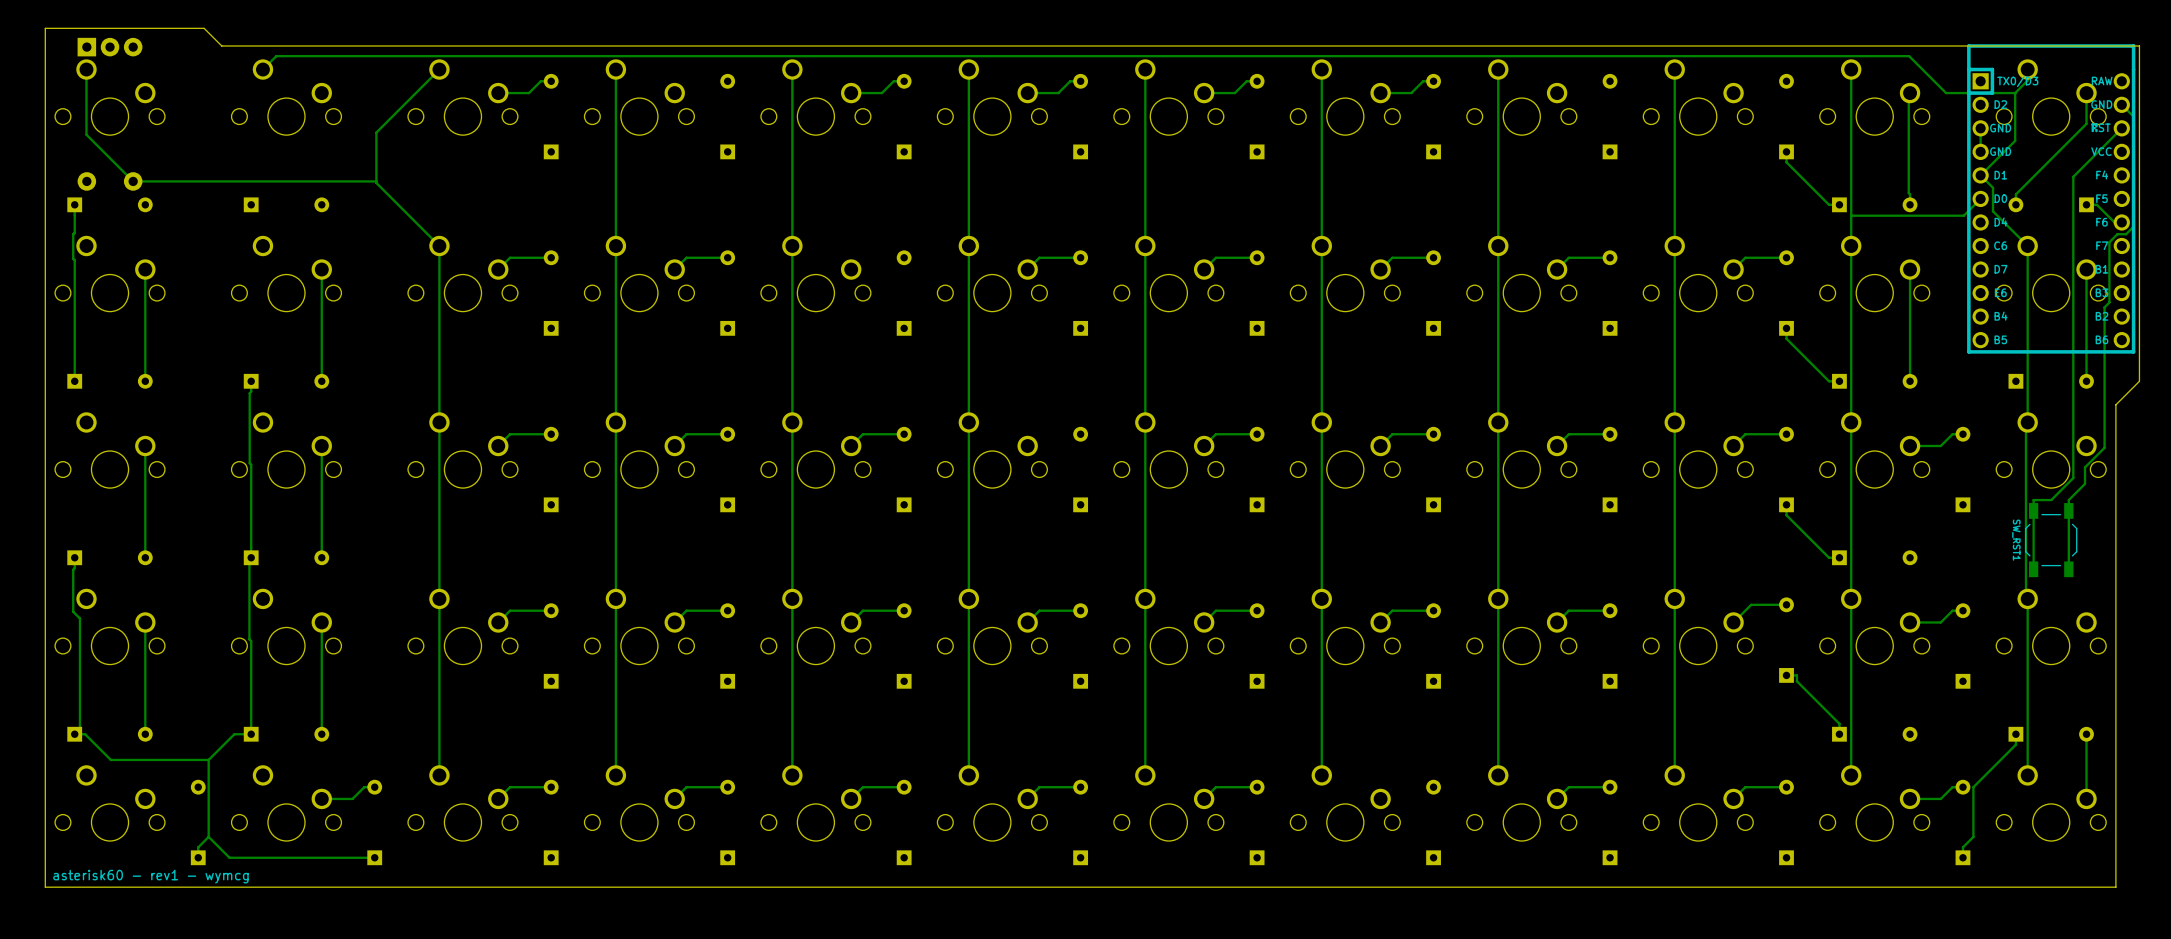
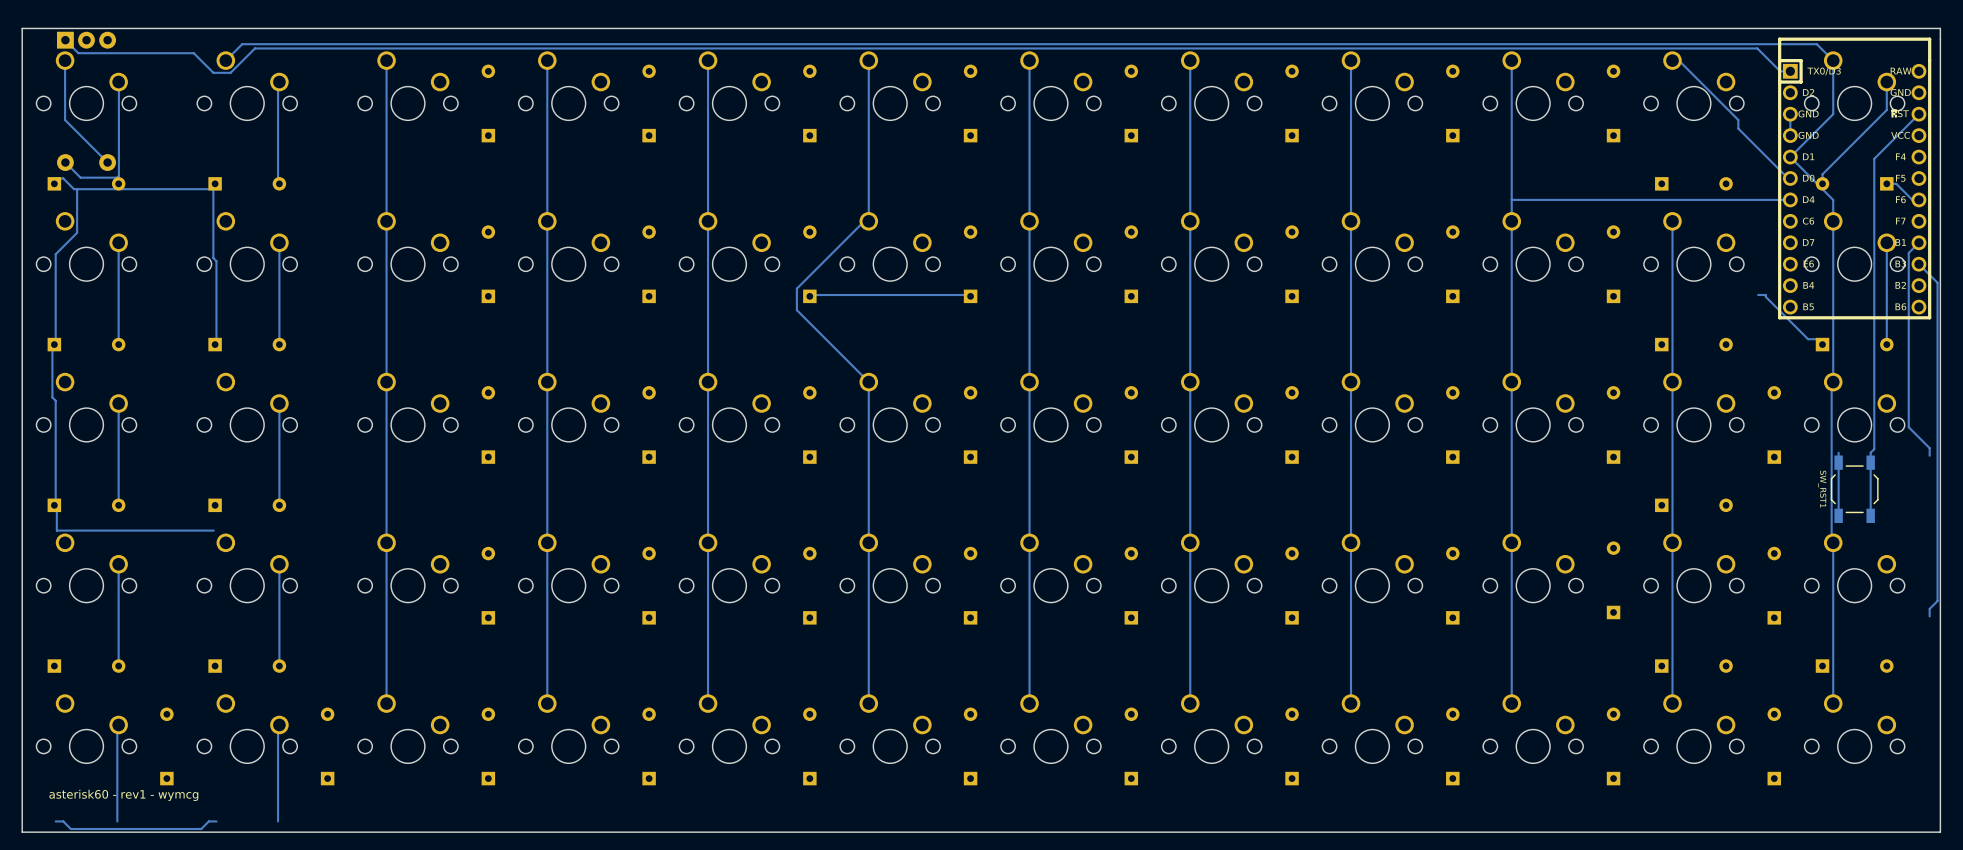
board edge: (204, 28) (45, 28) (45, 887) (2115, 887) (2115, 404) (2139, 381) (2139, 46) (221, 46) (204, 28) -> (1940, 28) (1940, 832) (22, 832) (22, 28) (1940, 28)
track: none -> (65, 40) (78, 53) (193, 53) (213, 72) (230, 72) (254, 48) (1757, 48) (1780, 71) (1790, 71)
track: (276, 56) (1909, 56) (1946, 93) (2015, 93) -> (238, 48) (242, 44) (1816, 44) (1833, 60)
track: (439, 69) (376, 132) (376, 182) (439, 246) -> (386, 60) (386, 221)
track: (1851, 69) (1851, 246) -> (1672, 60) (1678, 60) (1738, 119) (1738, 128) (1790, 178)
track: (2027, 80) (2015, 93) -> none
track: (551, 81) (540, 81) (529, 93) (498, 93) -> none
track: (904, 81) (893, 81) (881, 93) (851, 93) -> none
track: (1080, 81) (1070, 81) (1058, 93) (1027, 93) -> none
track: (1257, 81) (1246, 81) (1234, 93) (1204, 93) -> none
track: (1433, 81) (1423, 81) (1411, 93) (1380, 93) -> none
track: none -> (118, 82) (118, 176) (117, 177)
track: none -> (279, 82) (278, 178)
track: (1910, 93) (1910, 204) -> none
track: (2015, 93) (2015, 140) -> (1833, 70) (1833, 114) (1821, 125)
track: (2121, 104) (2133, 116) (2133, 227) (2126, 234) (2117, 234) (2109, 242) (2109, 302) (2104, 307) (2104, 447) (2085, 467) (2085, 483) (2072, 496) -> none
track: (1786, 151) (1786, 162) (1829, 204) (1839, 204) -> none
track: (2073, 176) (2073, 478) (2051, 500) (2033, 500) -> (1874, 158) (1874, 449)
track: none -> (65, 162) (80, 177) (117, 177)
track: (376, 181) (133, 181) -> none
track: (1993, 187) (1993, 211) (2027, 246) -> (1801, 168) (1833, 199) (1833, 221)
track: none -> (55, 178) (63, 178) (74, 189) (213, 189)
track: (1980, 198) (1963, 215) (1851, 215) -> none
track: (74, 204) (74, 381) -> none
track: none -> (77, 189) (77, 232) (55, 254) (55, 346) (52, 350) (52, 397) (55, 400) (56, 530) (213, 530)
track: none -> (213, 189) (213, 258) (216, 261) (216, 339)
track: none -> (1790, 199) (1511, 199)
track: (968, 246) (968, 422) -> (868, 221) (864, 221) (796, 288) (796, 310) (868, 382)
track: (551, 257) (510, 257) (498, 269) -> none
track: (727, 257) (686, 257) (674, 269) -> none
track: (1080, 257) (1039, 257) (1027, 269) -> none
track: (1257, 257) (1215, 257) (1204, 269) -> none
track: (1433, 257) (1392, 257) (1380, 269) -> none
track: (1610, 257) (1568, 257) (1557, 269) -> none
track: (1786, 257) (1745, 257) (1733, 269) -> none
track: (1910, 269) (1910, 381) -> none
track: none -> (1918, 242) (1908, 252) (1908, 427) (1929, 448) (1929, 455)
track: none -> (1918, 264) (1937, 282) (1937, 601) (1929, 608) (1929, 616)
track: none -> (965, 295) (804, 295)
track: none -> (1758, 295) (1765, 295) (1808, 339) (1823, 339)
track: (1786, 328) (1786, 338) (1829, 381) (1839, 381) -> none
track: (251, 381) (251, 557) -> none
track: (551, 434) (510, 434) (498, 446) -> none
track: (727, 434) (686, 434) (674, 446) -> none
track: (904, 434) (862, 434) (851, 446) -> none
track: (1257, 434) (1215, 434) (1204, 446) -> none
track: (1433, 434) (1392, 434) (1380, 446) -> none
track: (1610, 434) (1568, 434) (1557, 446) -> none
track: (1786, 434) (1745, 434) (1733, 446) -> none
track: (1962, 434) (1952, 434) (1940, 446) (1910, 446) -> none
track: (1786, 504) (1786, 515) (1829, 557) (1839, 557) -> none
track: (251, 552) (249, 554) (251, 734) (234, 734) (208, 759) -> none
track: (74, 557) (73, 611) (79, 618) (79, 734) -> none
track: (1786, 604) (1751, 604) (1733, 622) -> none
track: (551, 610) (510, 610) (498, 622) -> none
track: (727, 610) (686, 610) (674, 622) -> none
track: (904, 610) (862, 610) (851, 622) -> none
track: (1080, 610) (1039, 610) (1027, 622) -> none
track: (1257, 610) (1215, 610) (1204, 622) -> none
track: (1433, 610) (1392, 610) (1380, 622) -> none
track: (1610, 610) (1568, 610) (1557, 622) -> none
track: (1962, 610) (1952, 610) (1940, 622) (1910, 622) -> none
track: (1786, 675) (1796, 675) (1796, 681) (1839, 723) (1839, 734) -> none
track: (74, 734) (85, 734) (110, 759) (208, 759) -> none
track: (2015, 734) (2015, 744) (1973, 787) (1973, 836) (1962, 847) (1962, 857) -> none
track: (2086, 734) (2086, 798) -> none
track: (208, 759) (208, 836) -> none
track: (374, 787) (364, 787) (352, 798) (321, 798) -> (278, 821) (279, 725)
track: (551, 787) (510, 787) (498, 798) -> none
track: (727, 787) (686, 787) (674, 798) -> none
track: (904, 787) (862, 787) (851, 798) -> none
track: (1080, 787) (1039, 787) (1027, 798) -> none
track: (1257, 787) (1215, 787) (1204, 798) -> none
track: (1610, 787) (1568, 787) (1557, 798) -> none
track: (1786, 787) (1745, 787) (1733, 798) -> none
track: (1962, 787) (1952, 787) (1940, 798) (1910, 798) -> none
track: none -> (118, 725) (117, 821)
track: (208, 836) (198, 847) (198, 857) -> none
track: (208, 836) (229, 857) (374, 857) -> none
track: none -> (216, 821) (208, 821) (201, 829) (70, 829) (63, 821) (55, 821)

